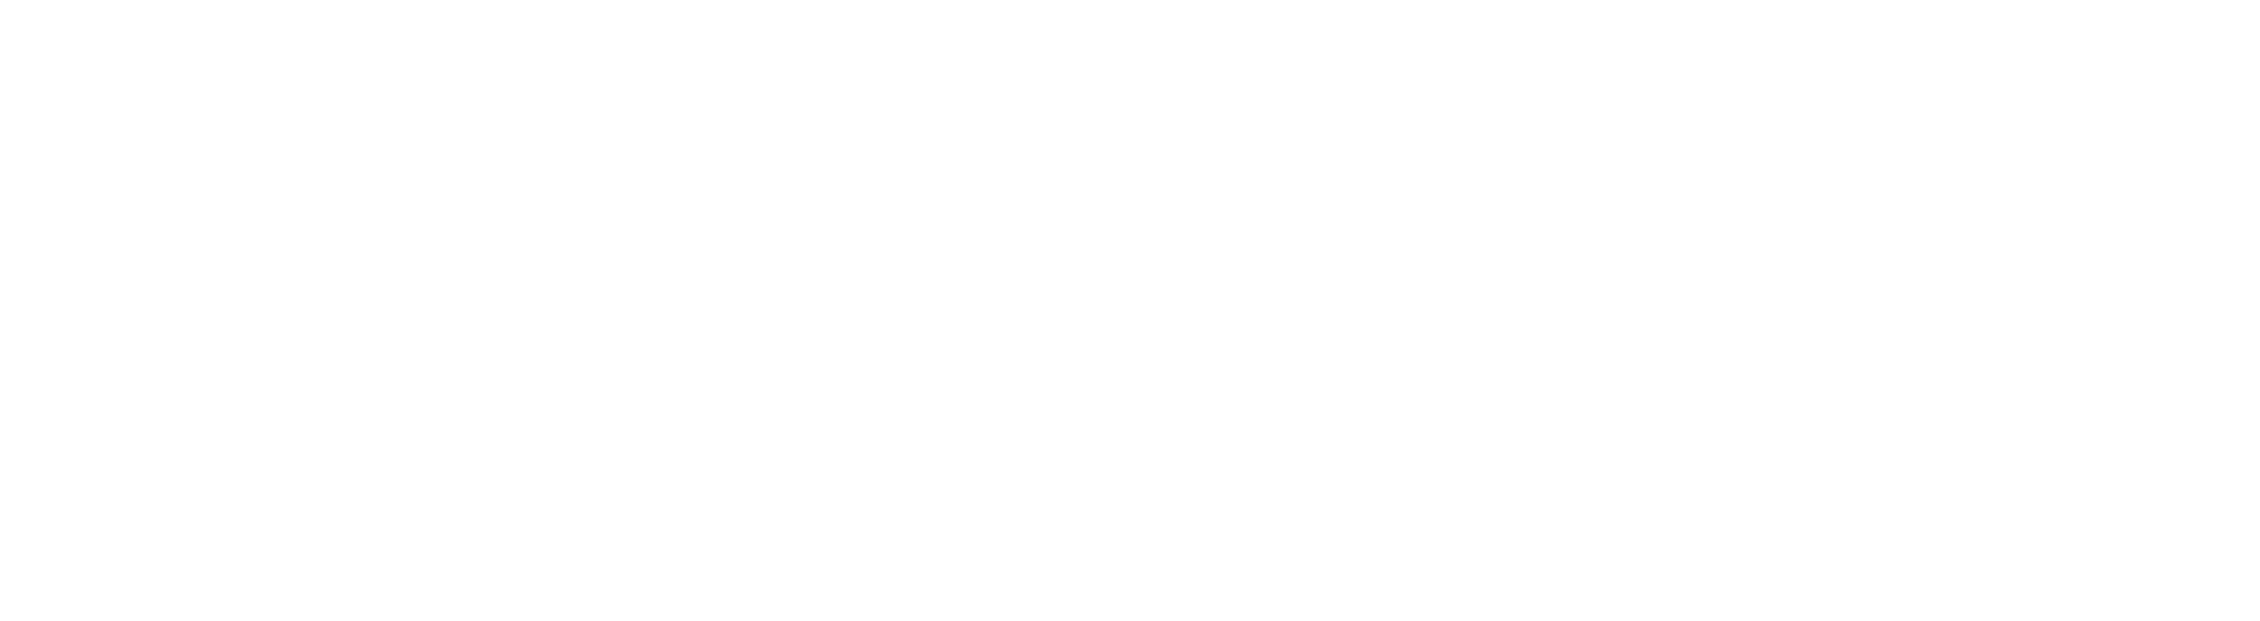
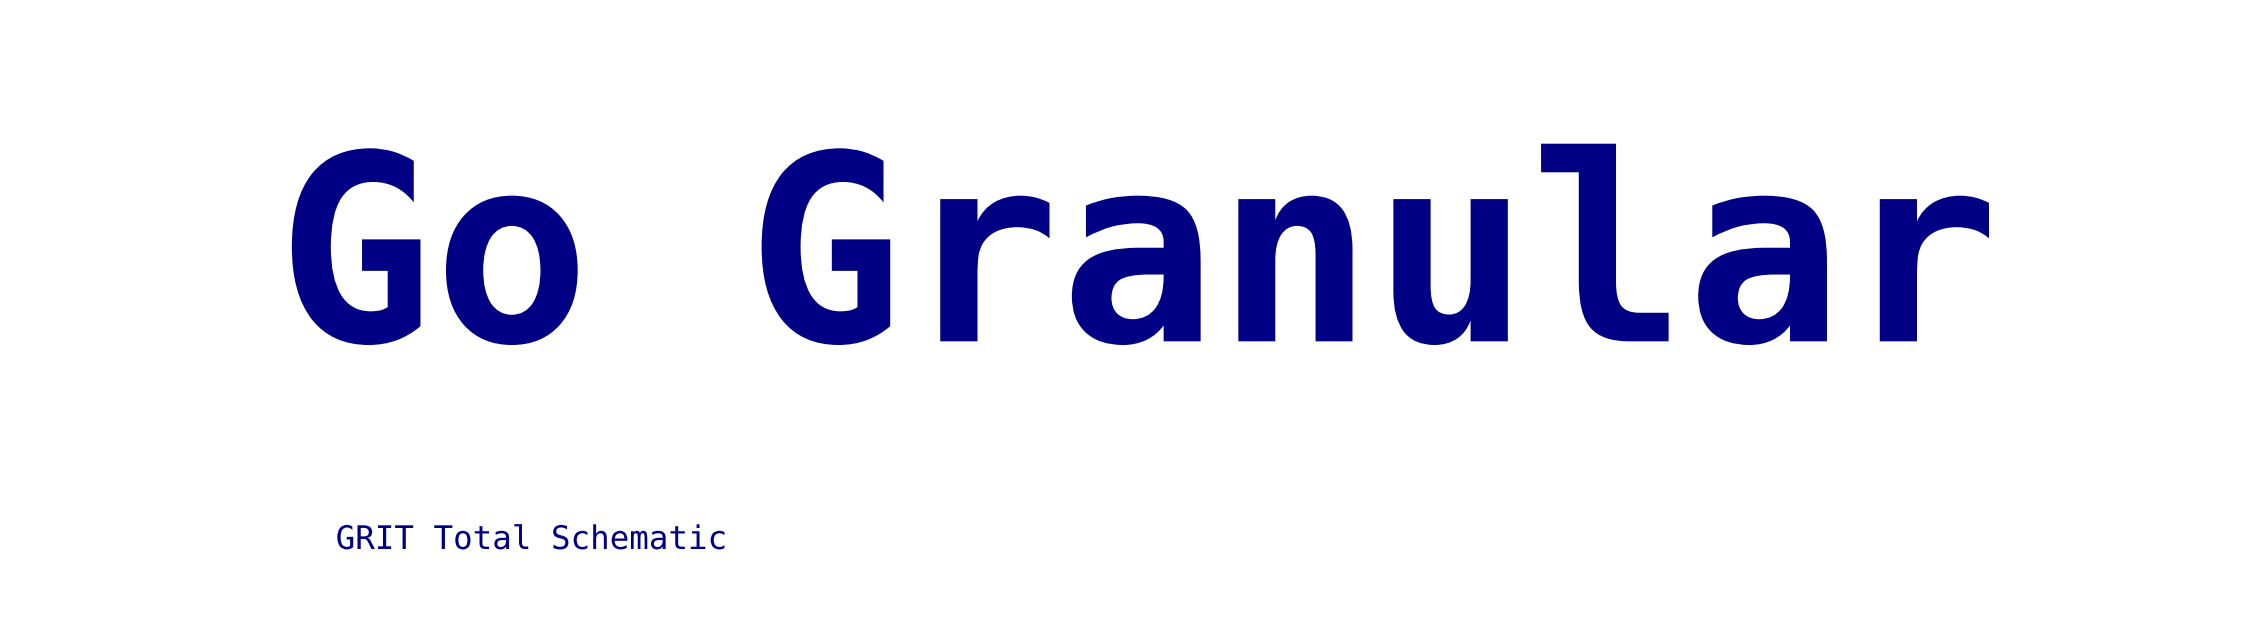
text: none -> Go Granular (1140, 244)
text: none -> GRIT Total Schematic (530, 536)

